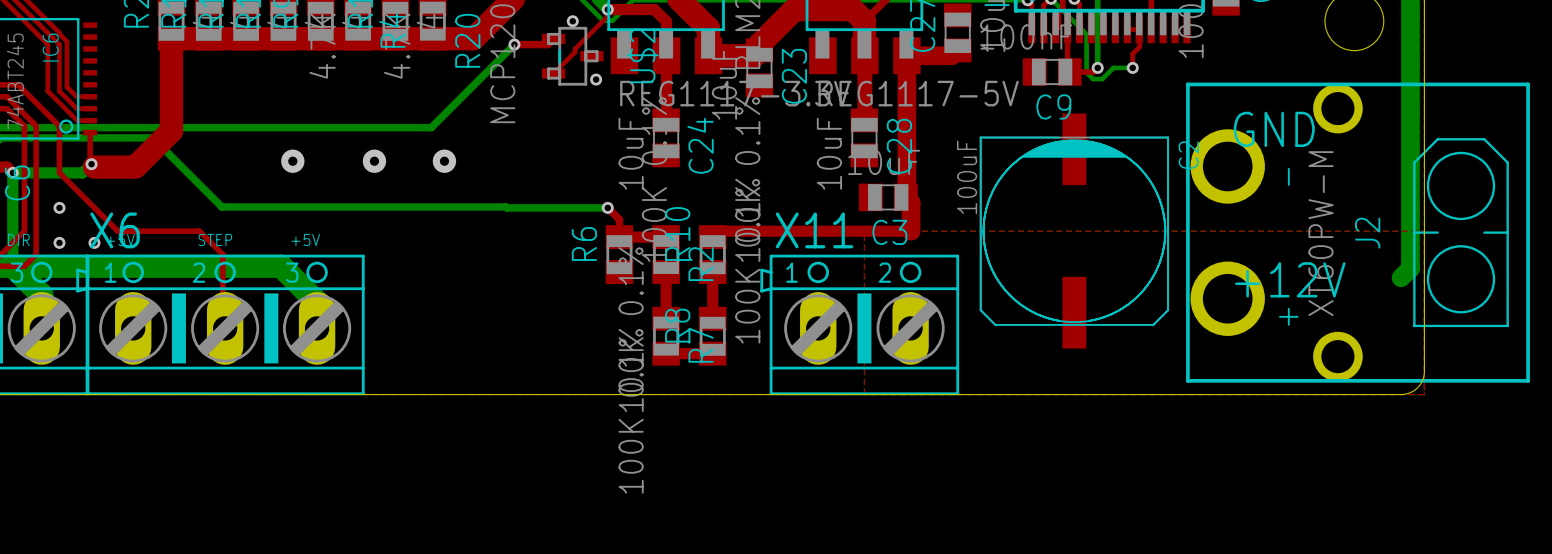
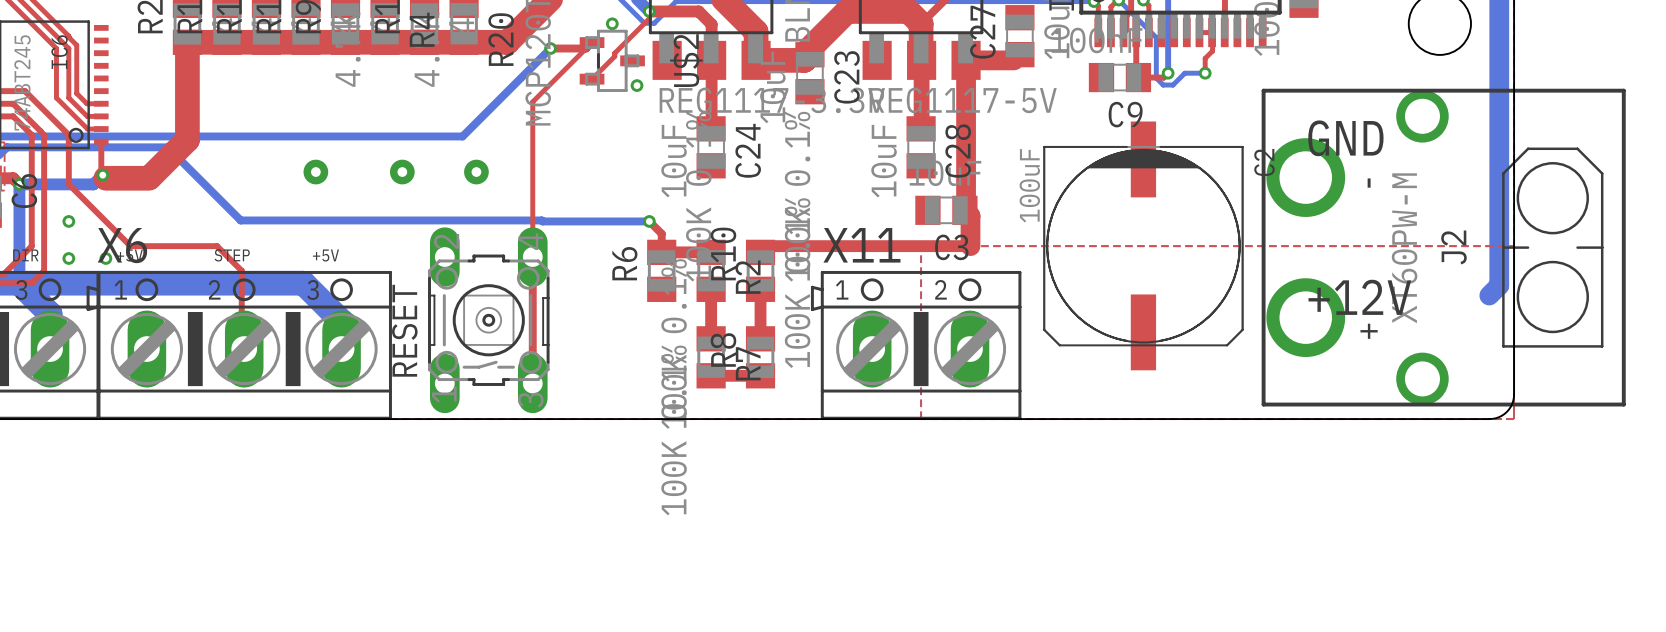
top track: none -> (592, 42) (532, 101) (532, 383)
RESET: none -> (488, 320)

